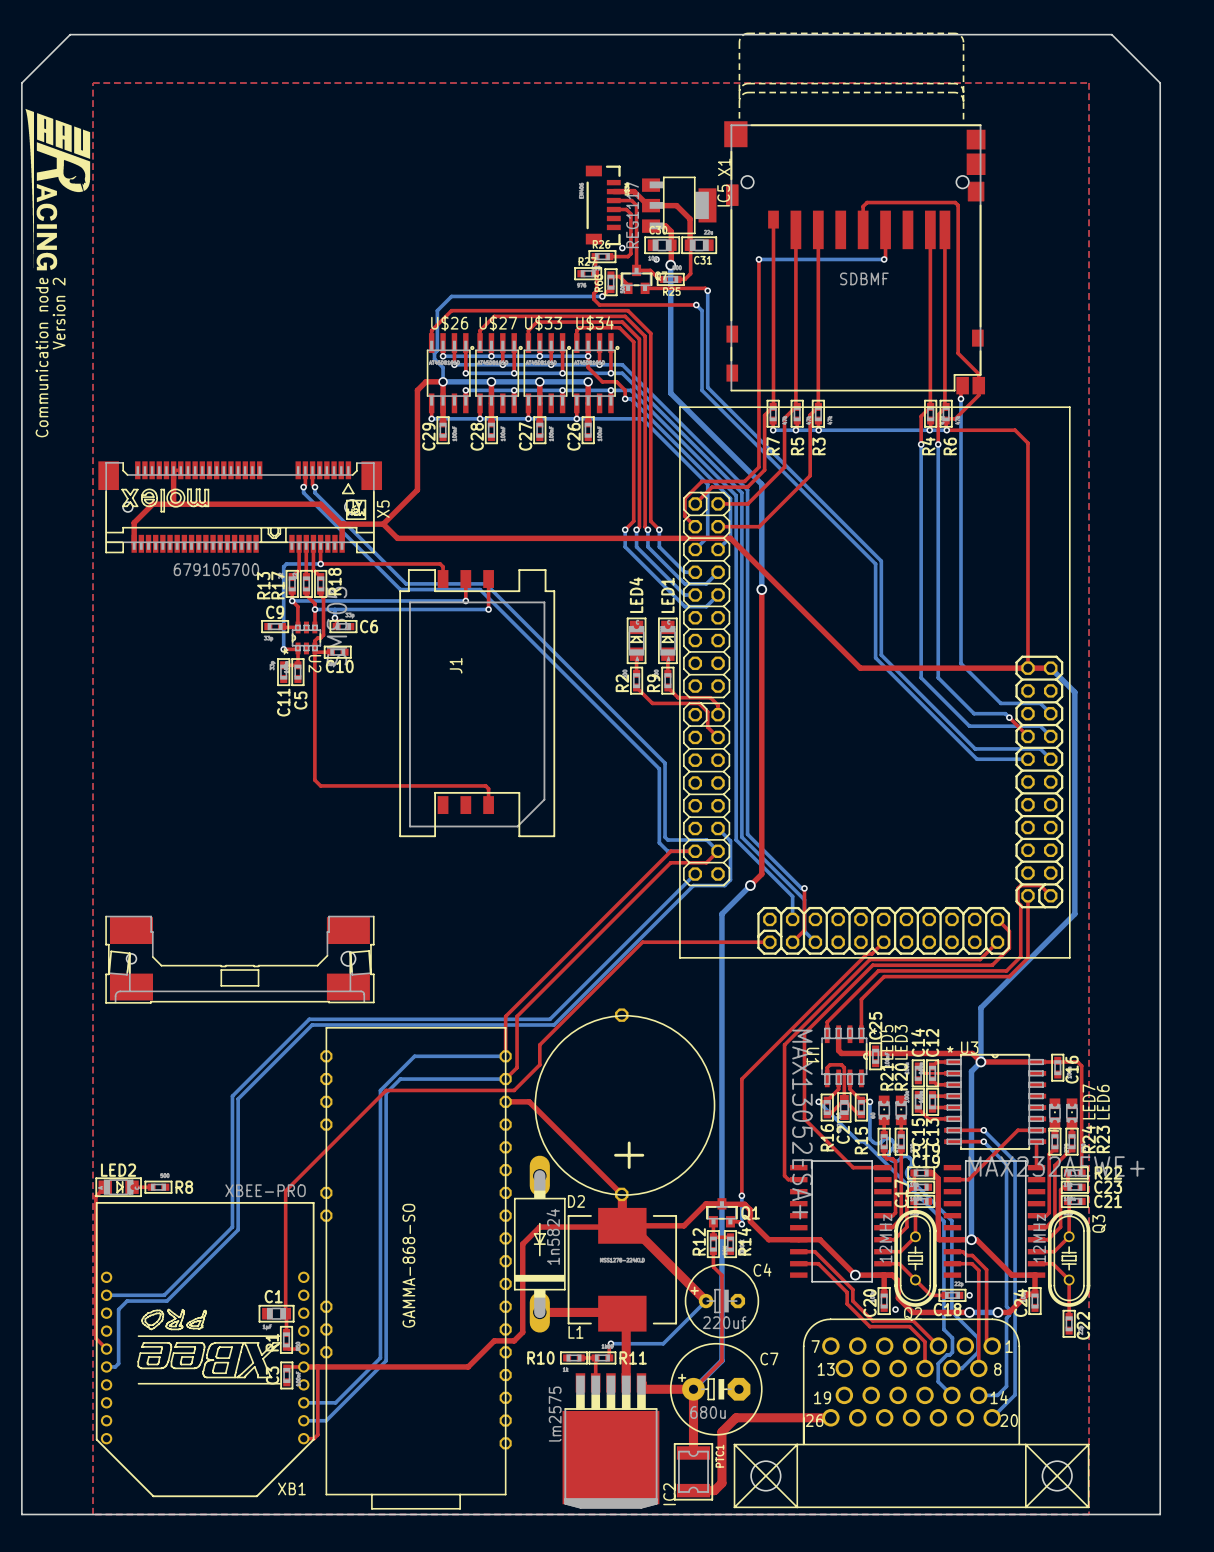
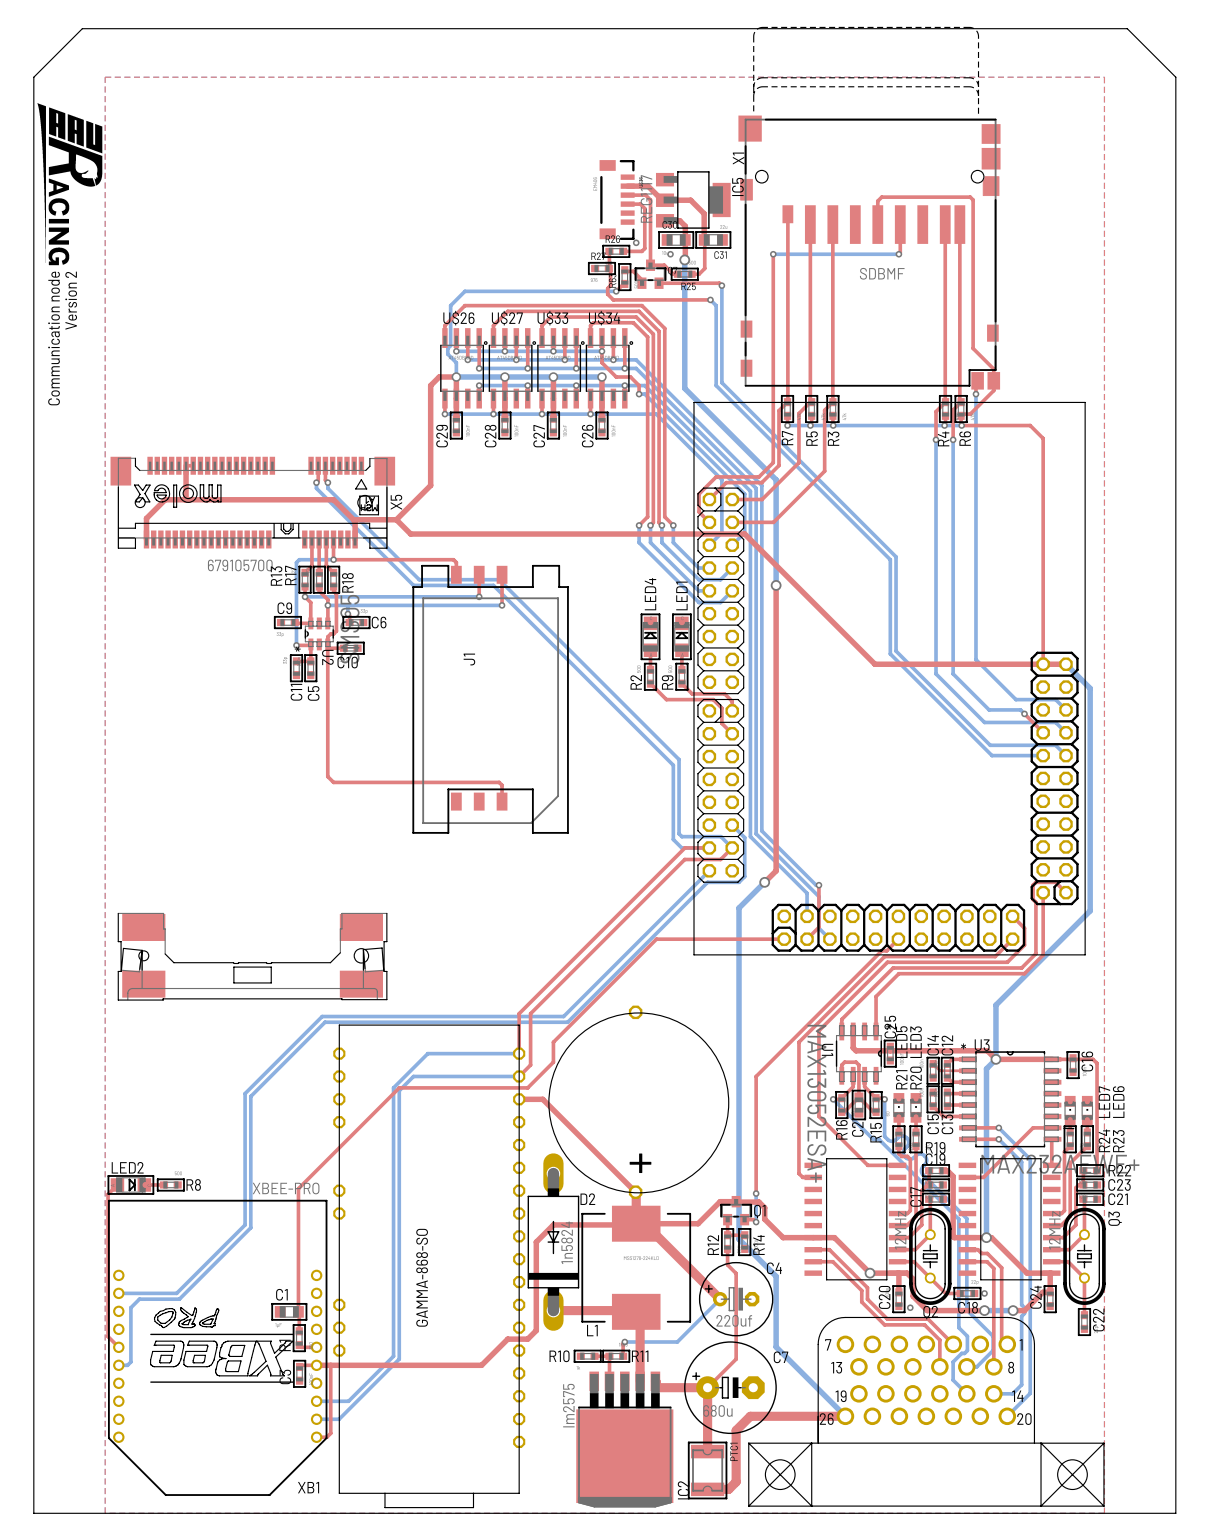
bottom track: (724, 911) (721, 914) (721, 1360) (693, 1389) -> (739, 908) (739, 1239) (776, 1276) (776, 1346) (845, 1416)

